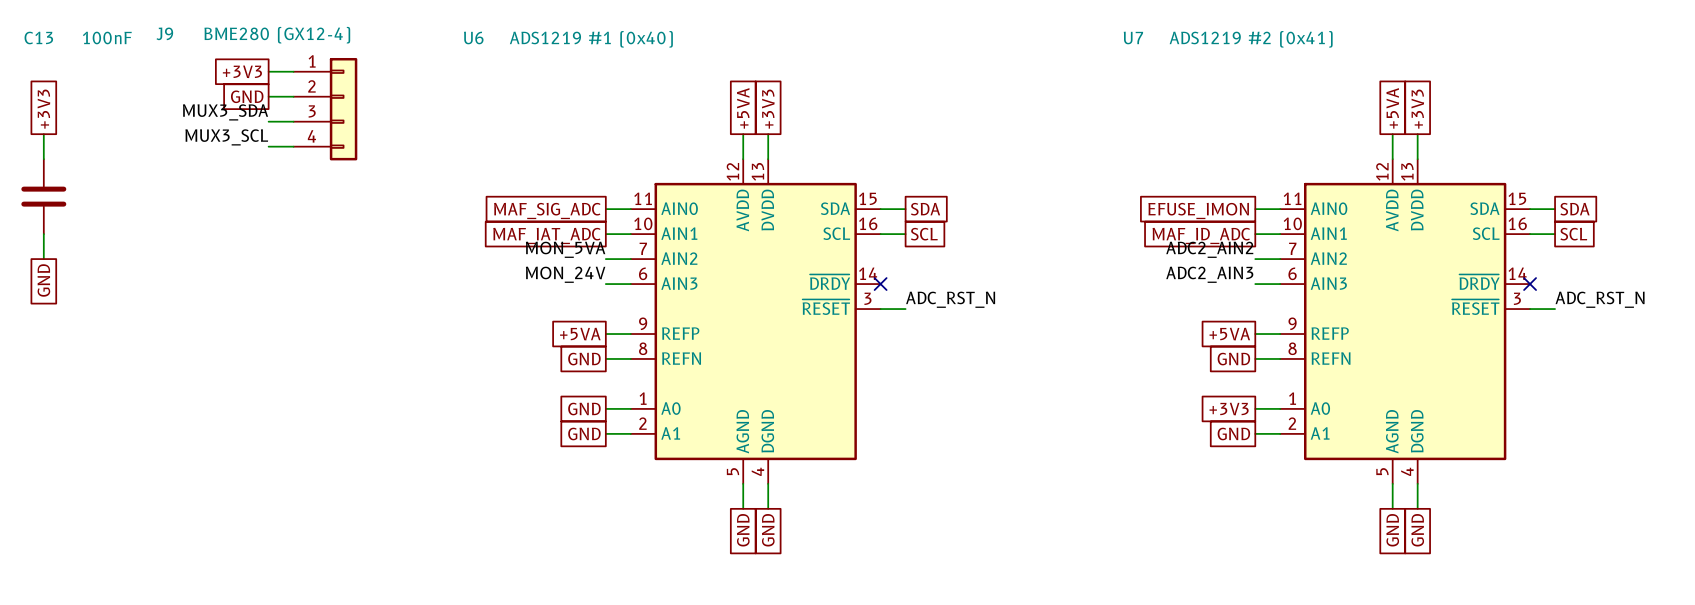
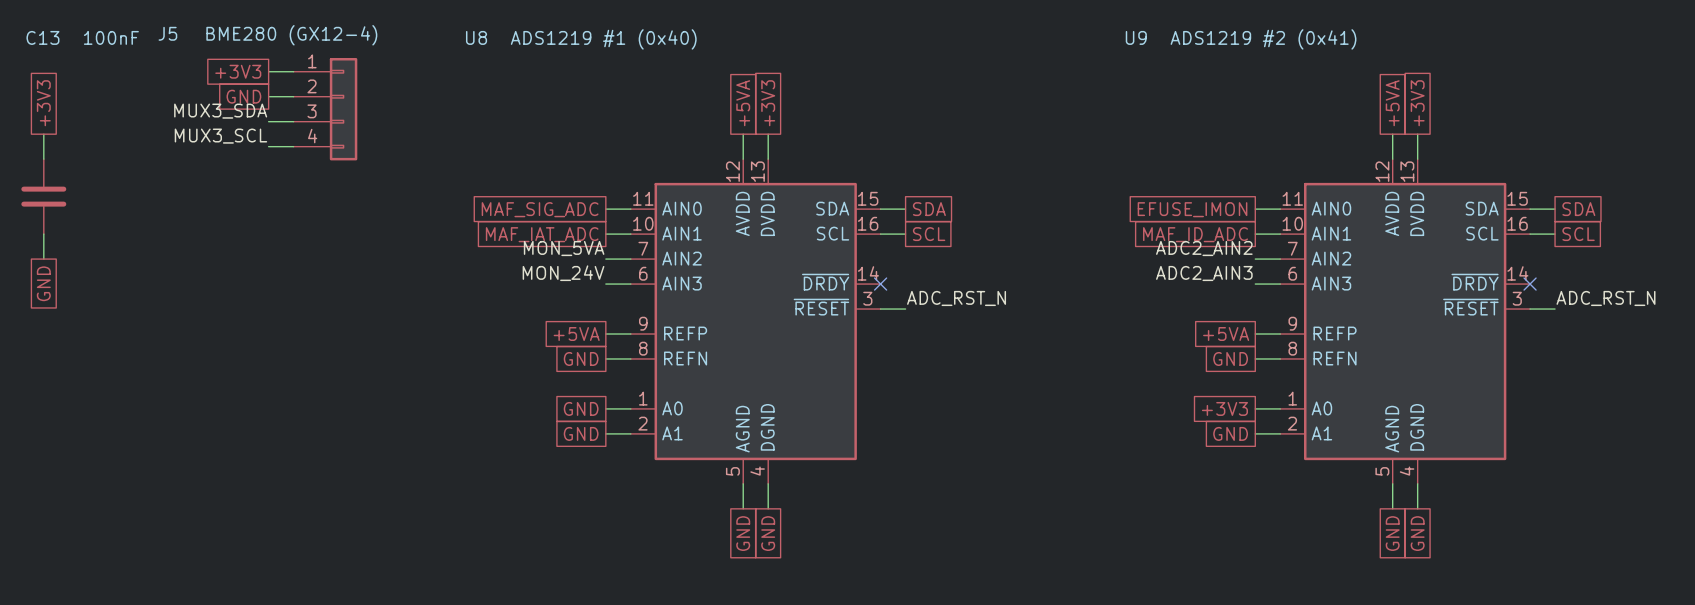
J9 name: J9 (164, 33) -> J5 (167, 33)
U6 name: U6 (473, 37) -> U8 (476, 37)
U7 name: U7 (1133, 37) -> U9 (1136, 37)

